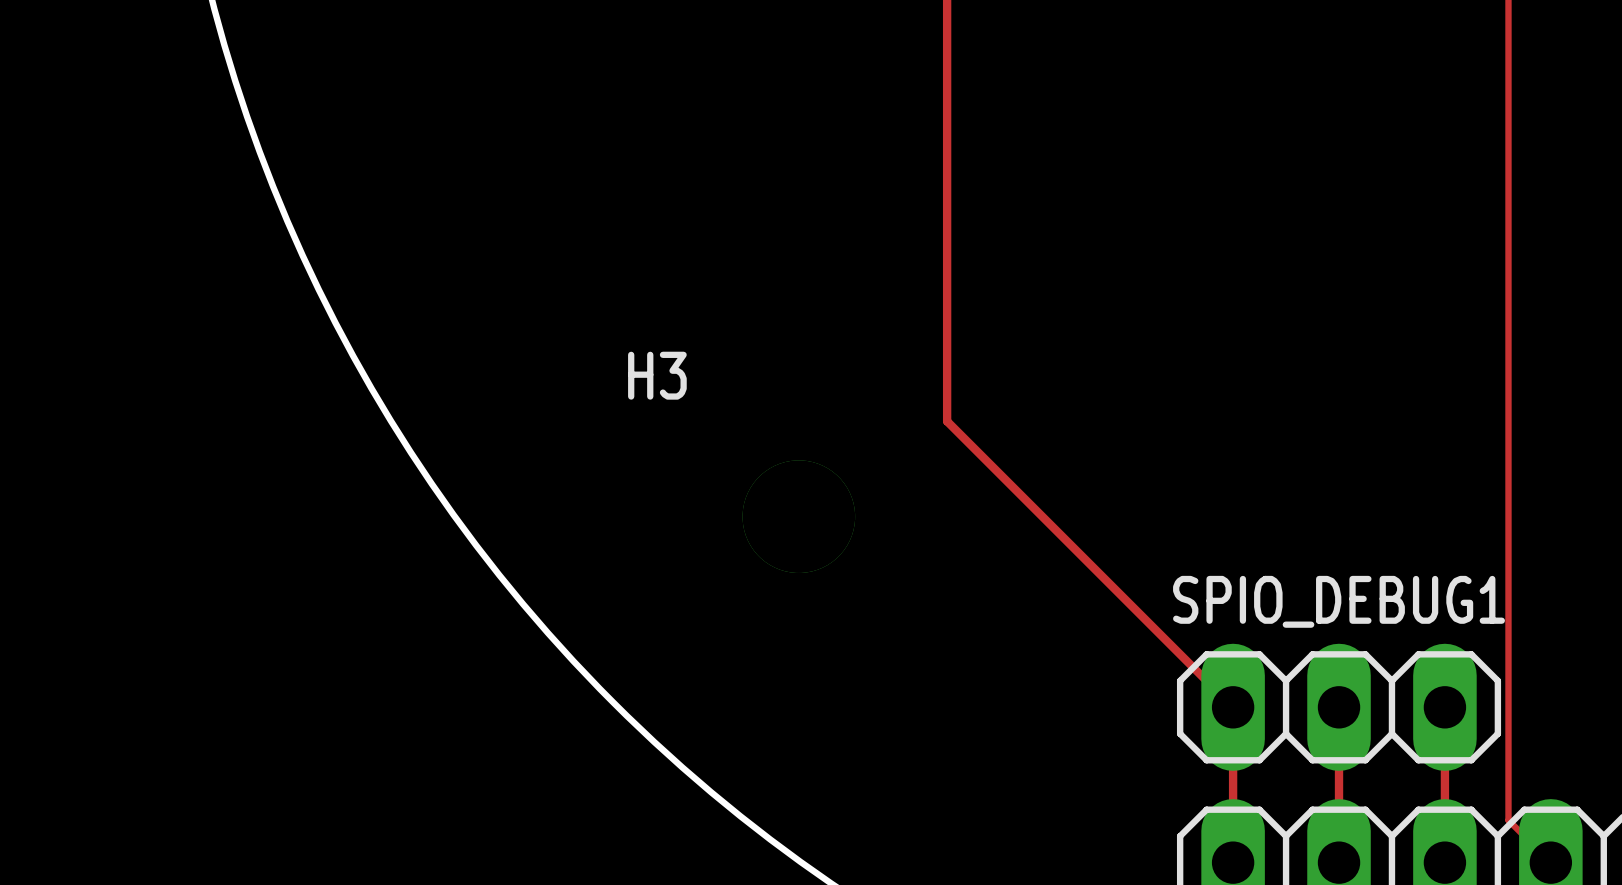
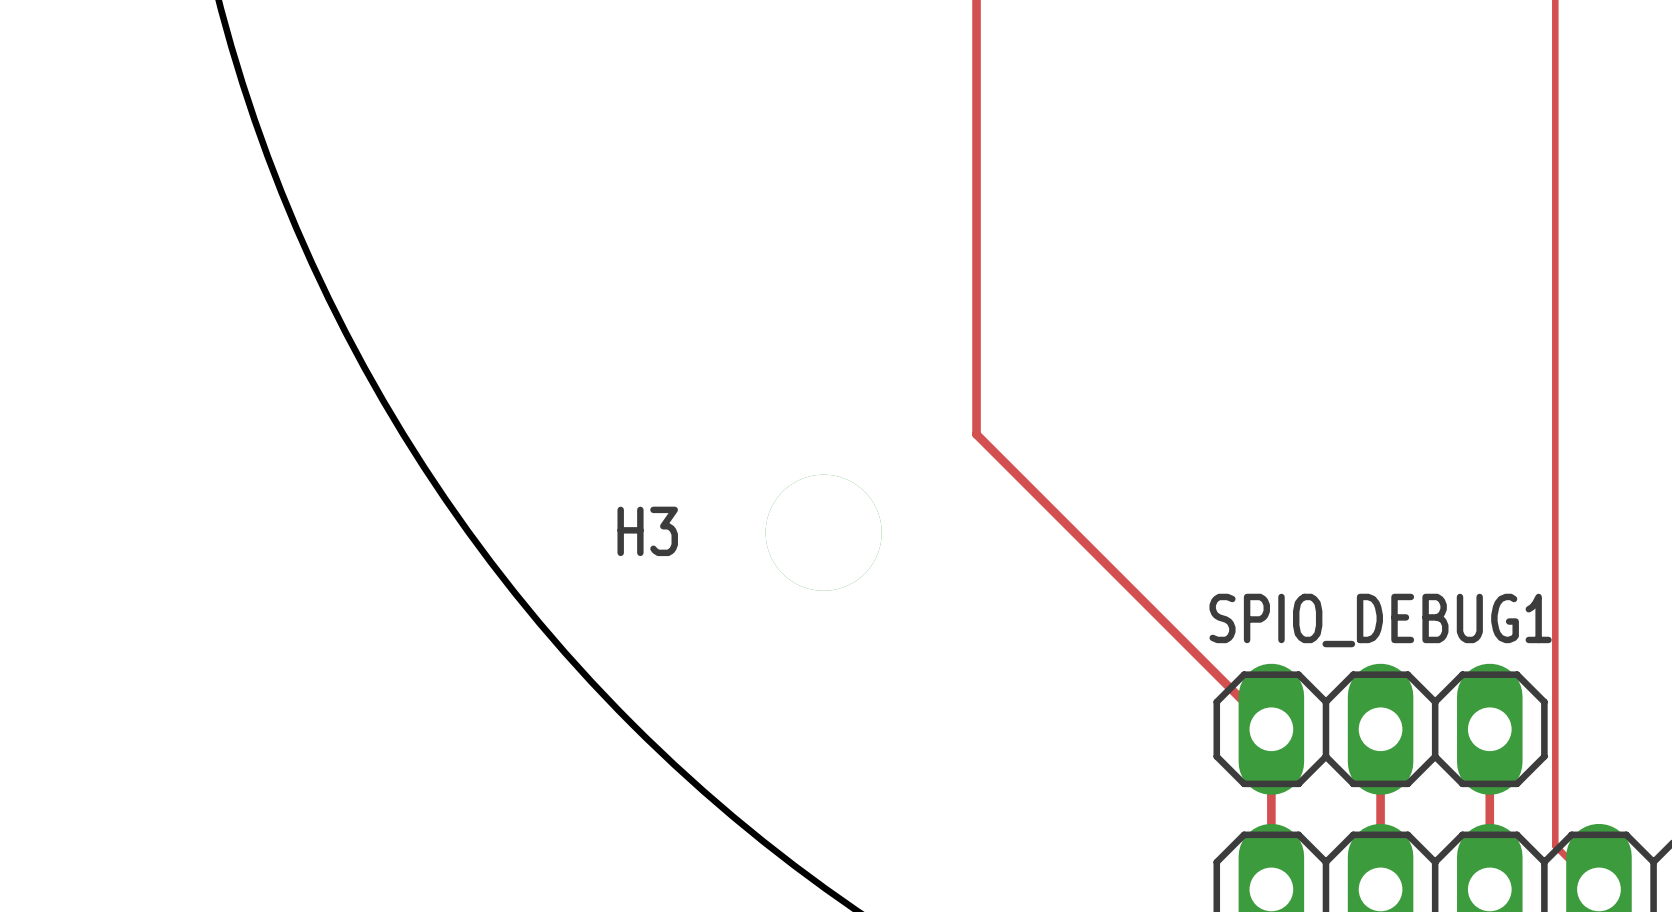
H3 name position: H3 (657, 375) -> H3 (647, 531)

